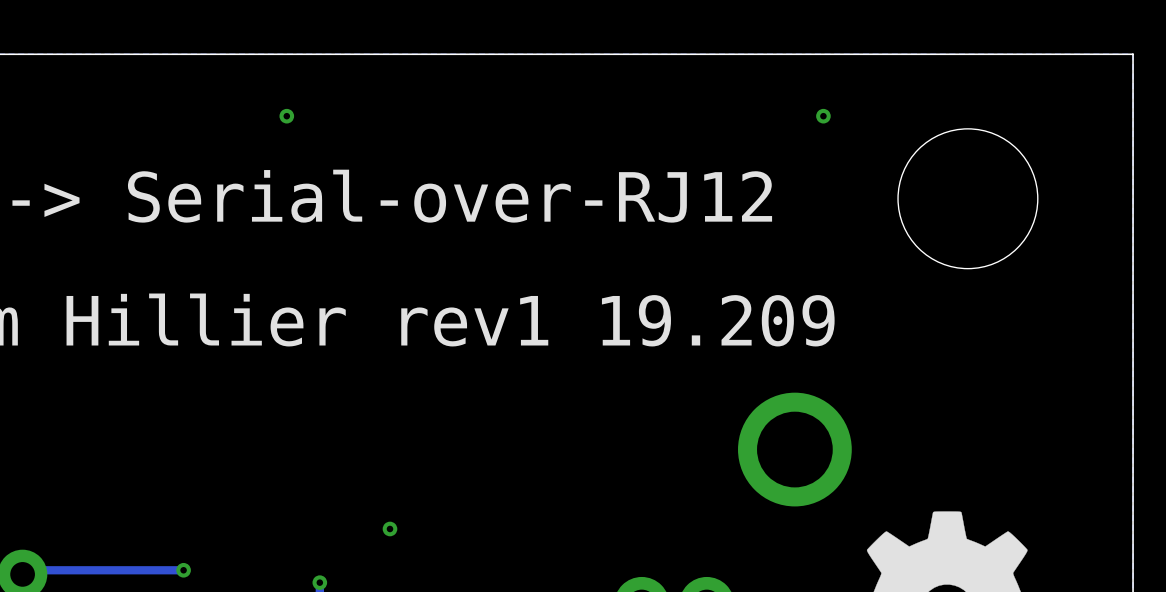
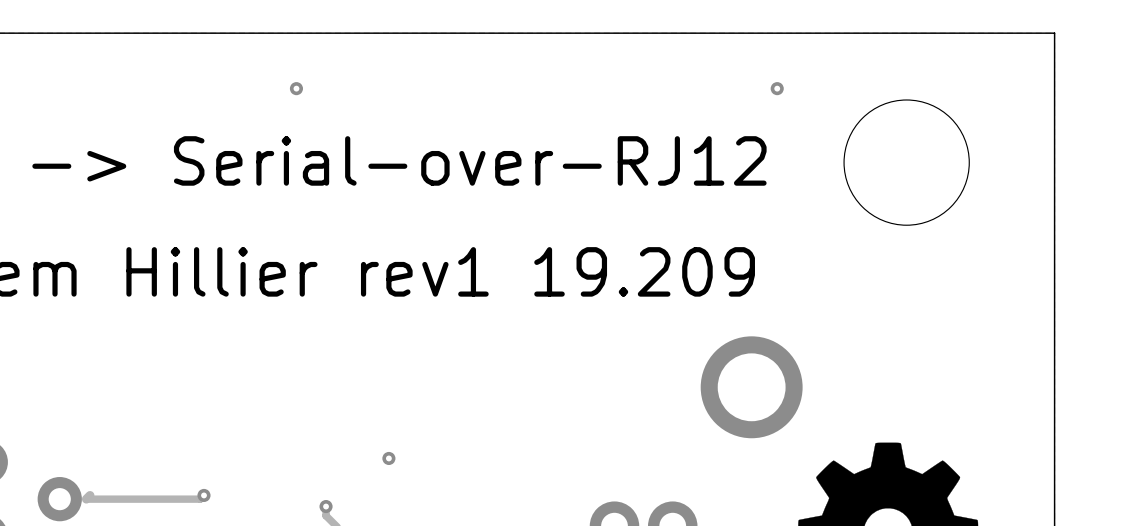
track: (183, 570) (26, 570) (22, 574) -> (203, 495) (200, 499) (86, 499) (90, 495)

